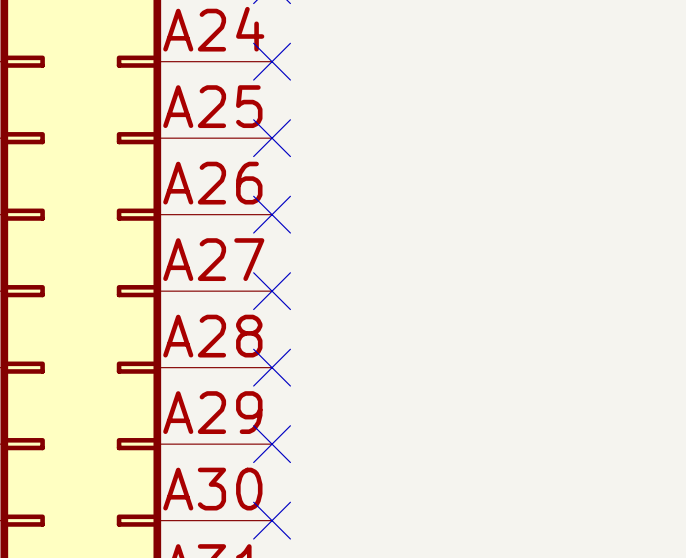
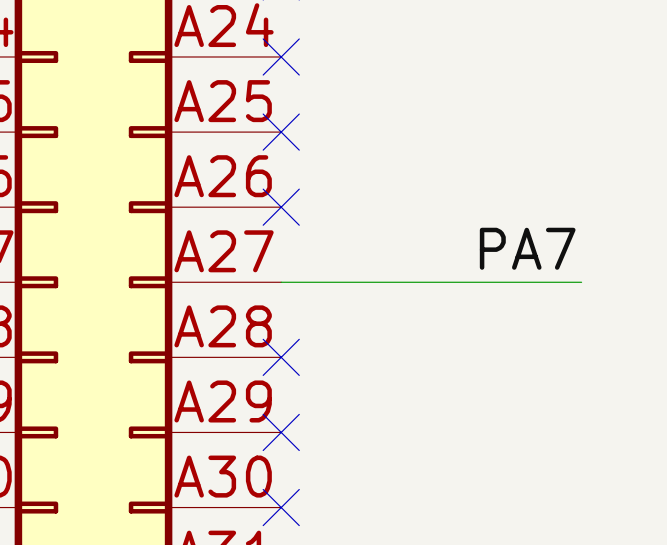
label: none -> PA7 (527, 248)
wire: none -> (281, 282) (581, 282)
no-connect mark: (272, 291) -> none

